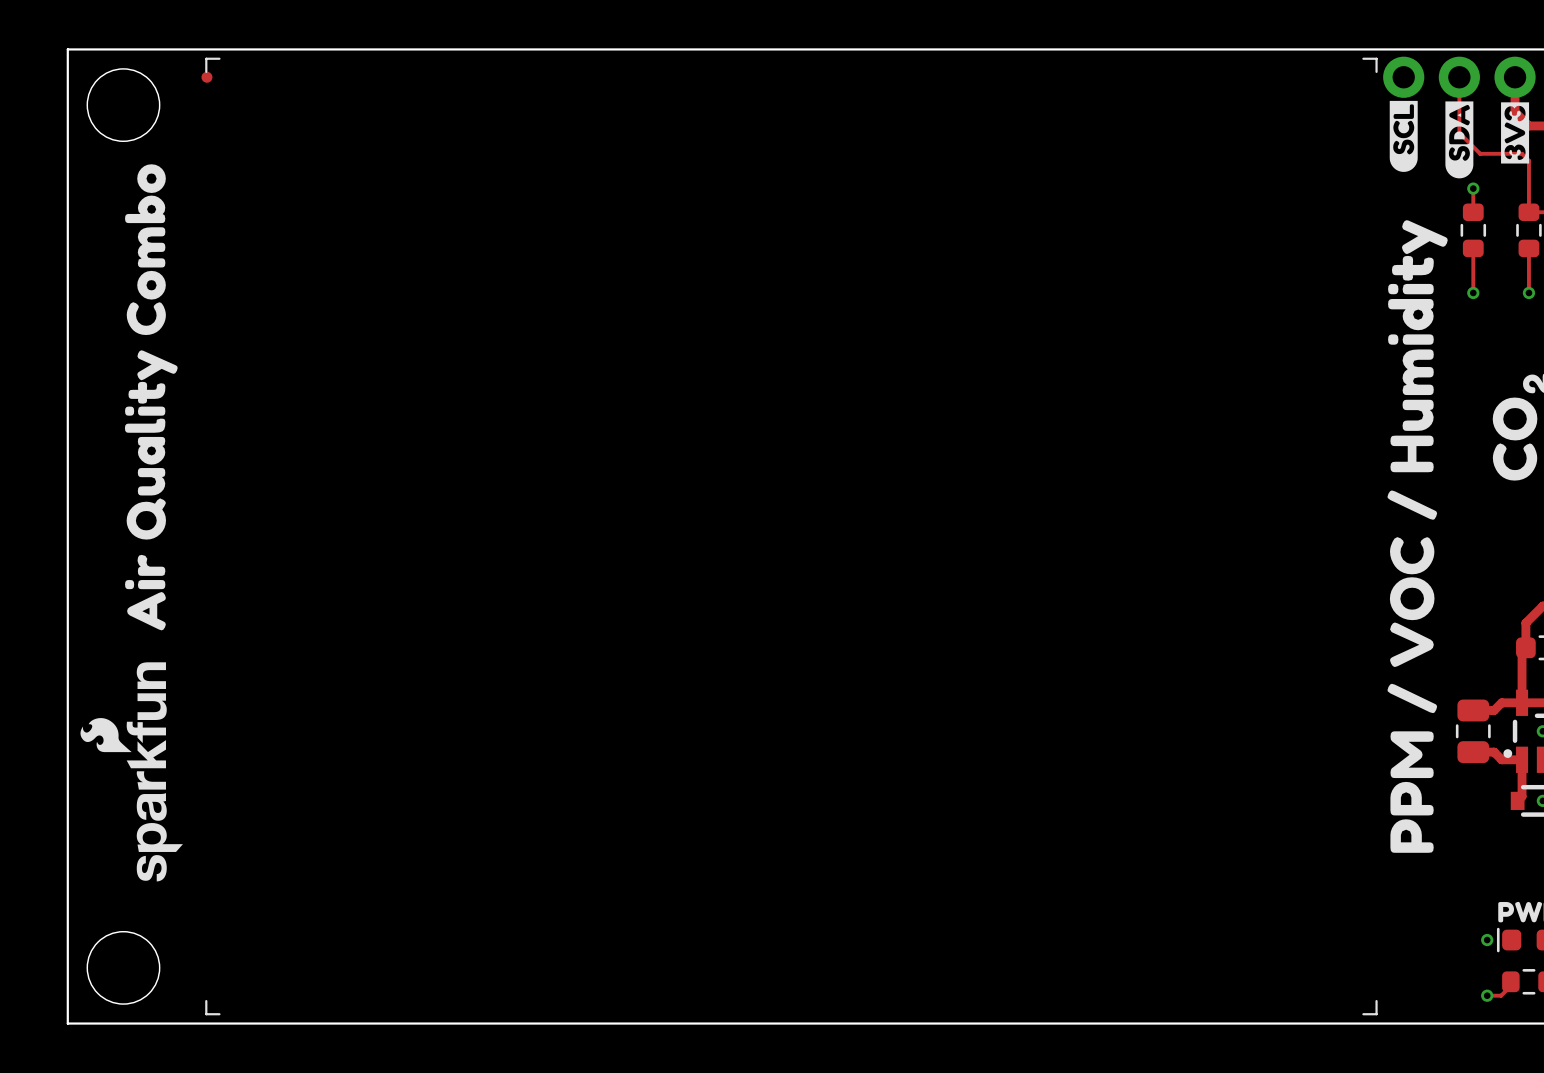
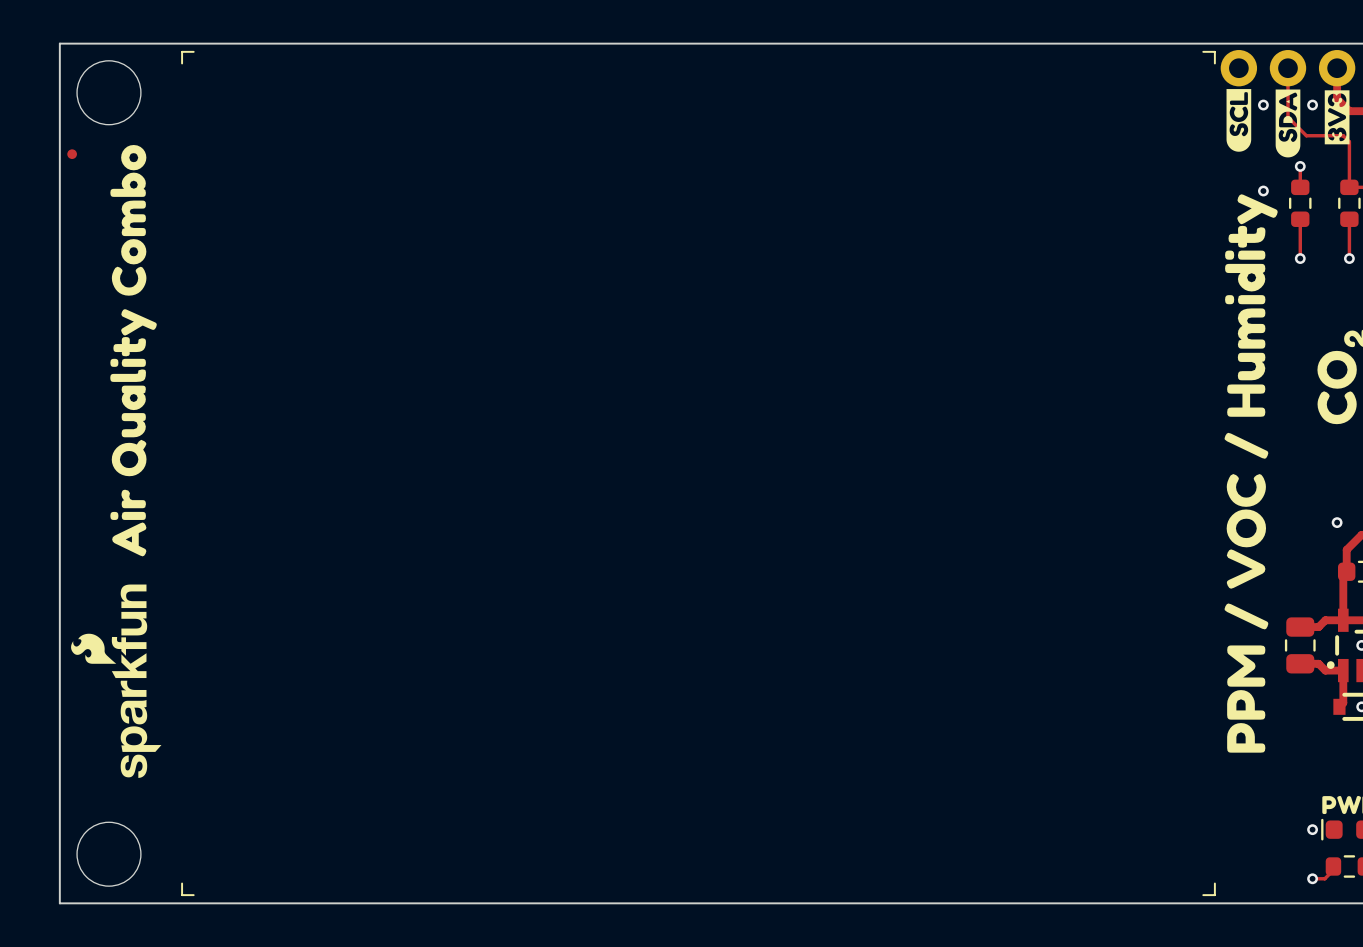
part position: (206, 77) -> (72, 154)
via: none -> (1263, 105)
via: none -> (1312, 105)
via: none -> (1263, 191)
via: none -> (1337, 522)

